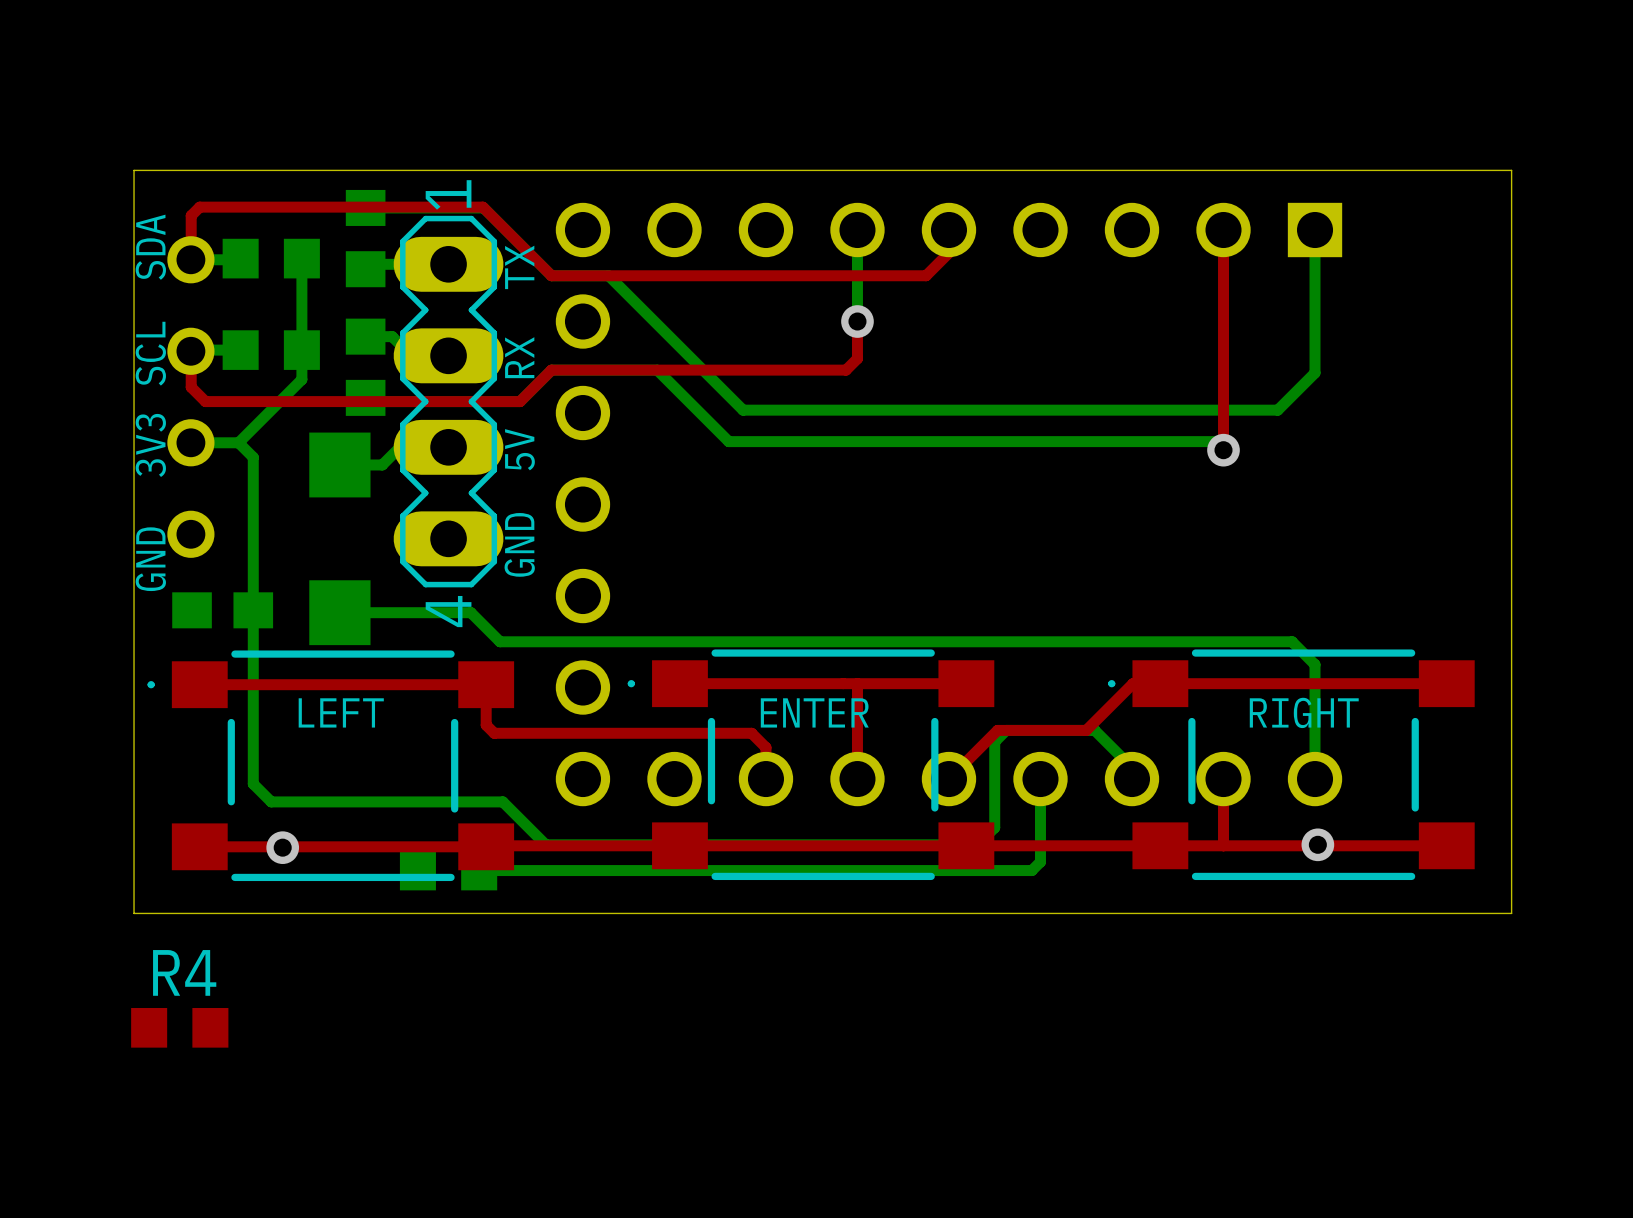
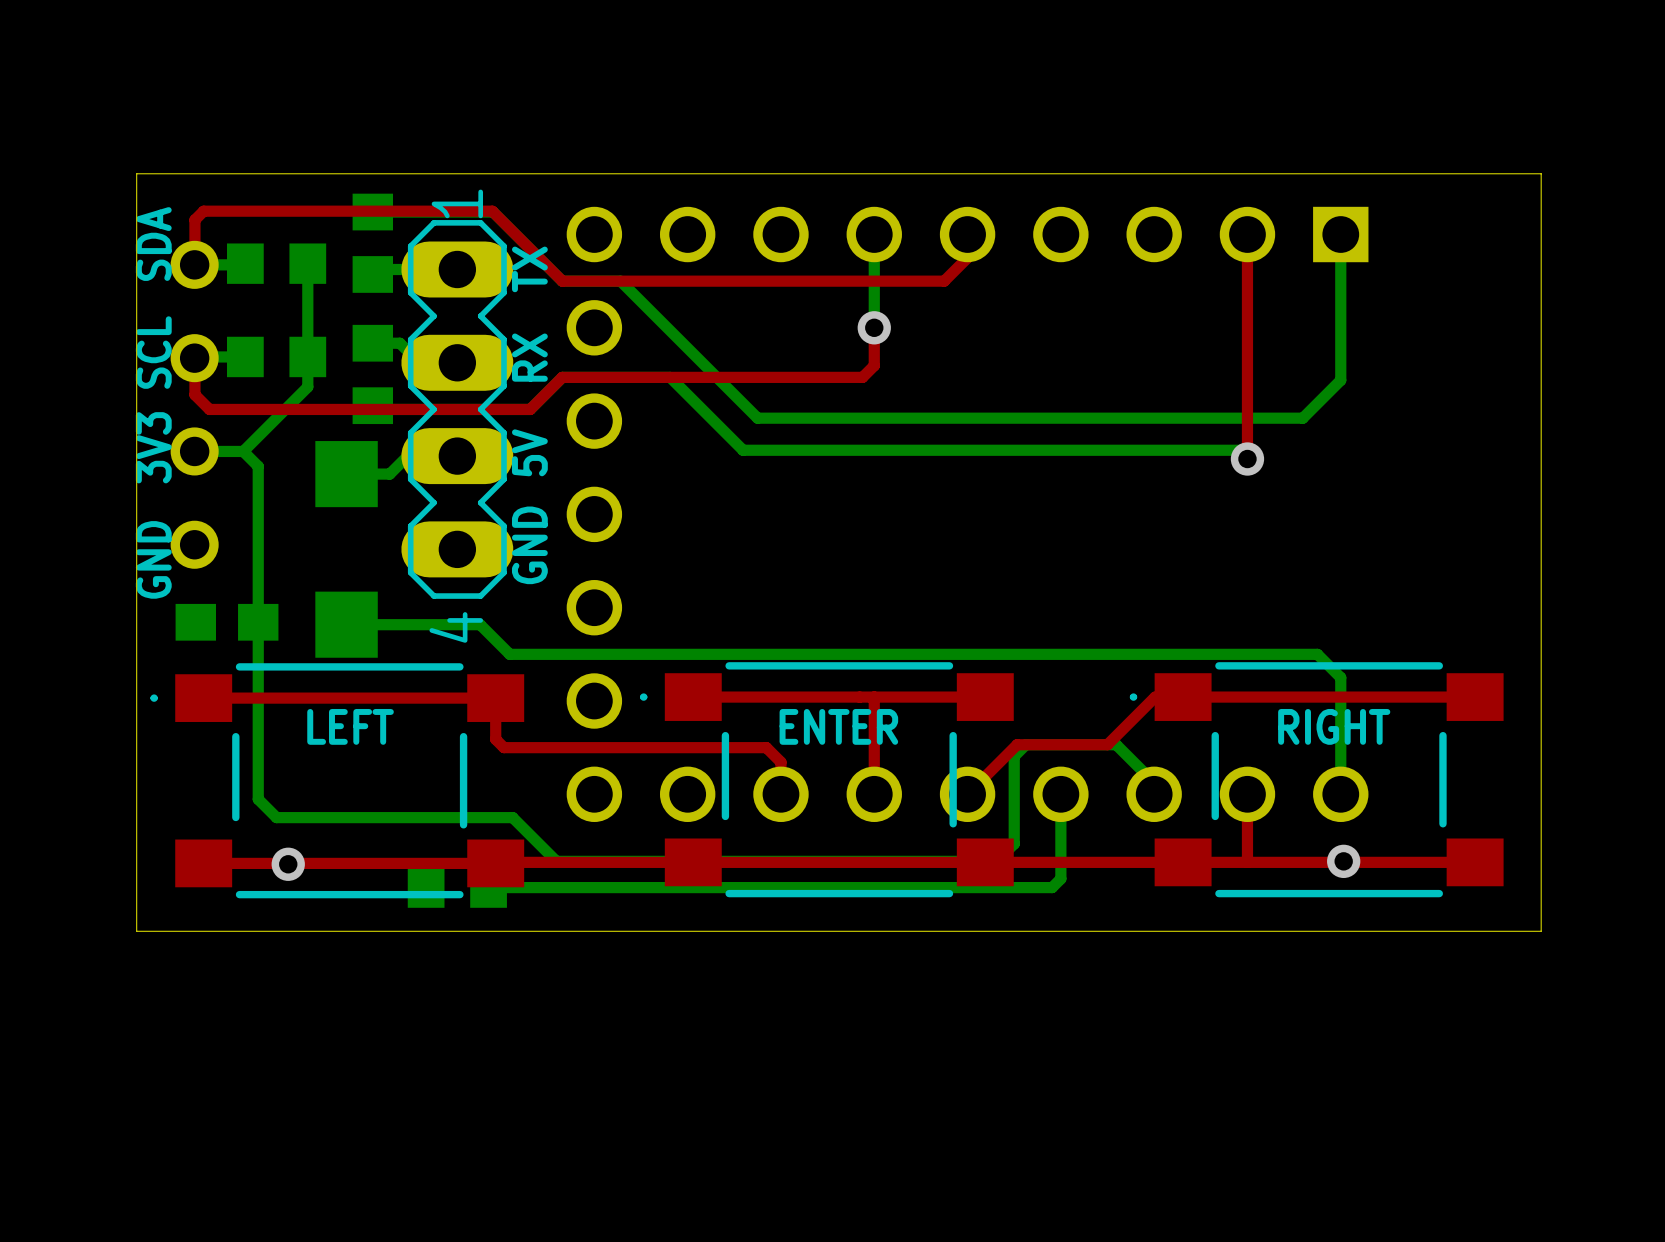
R4: (179, 1027) -> none

